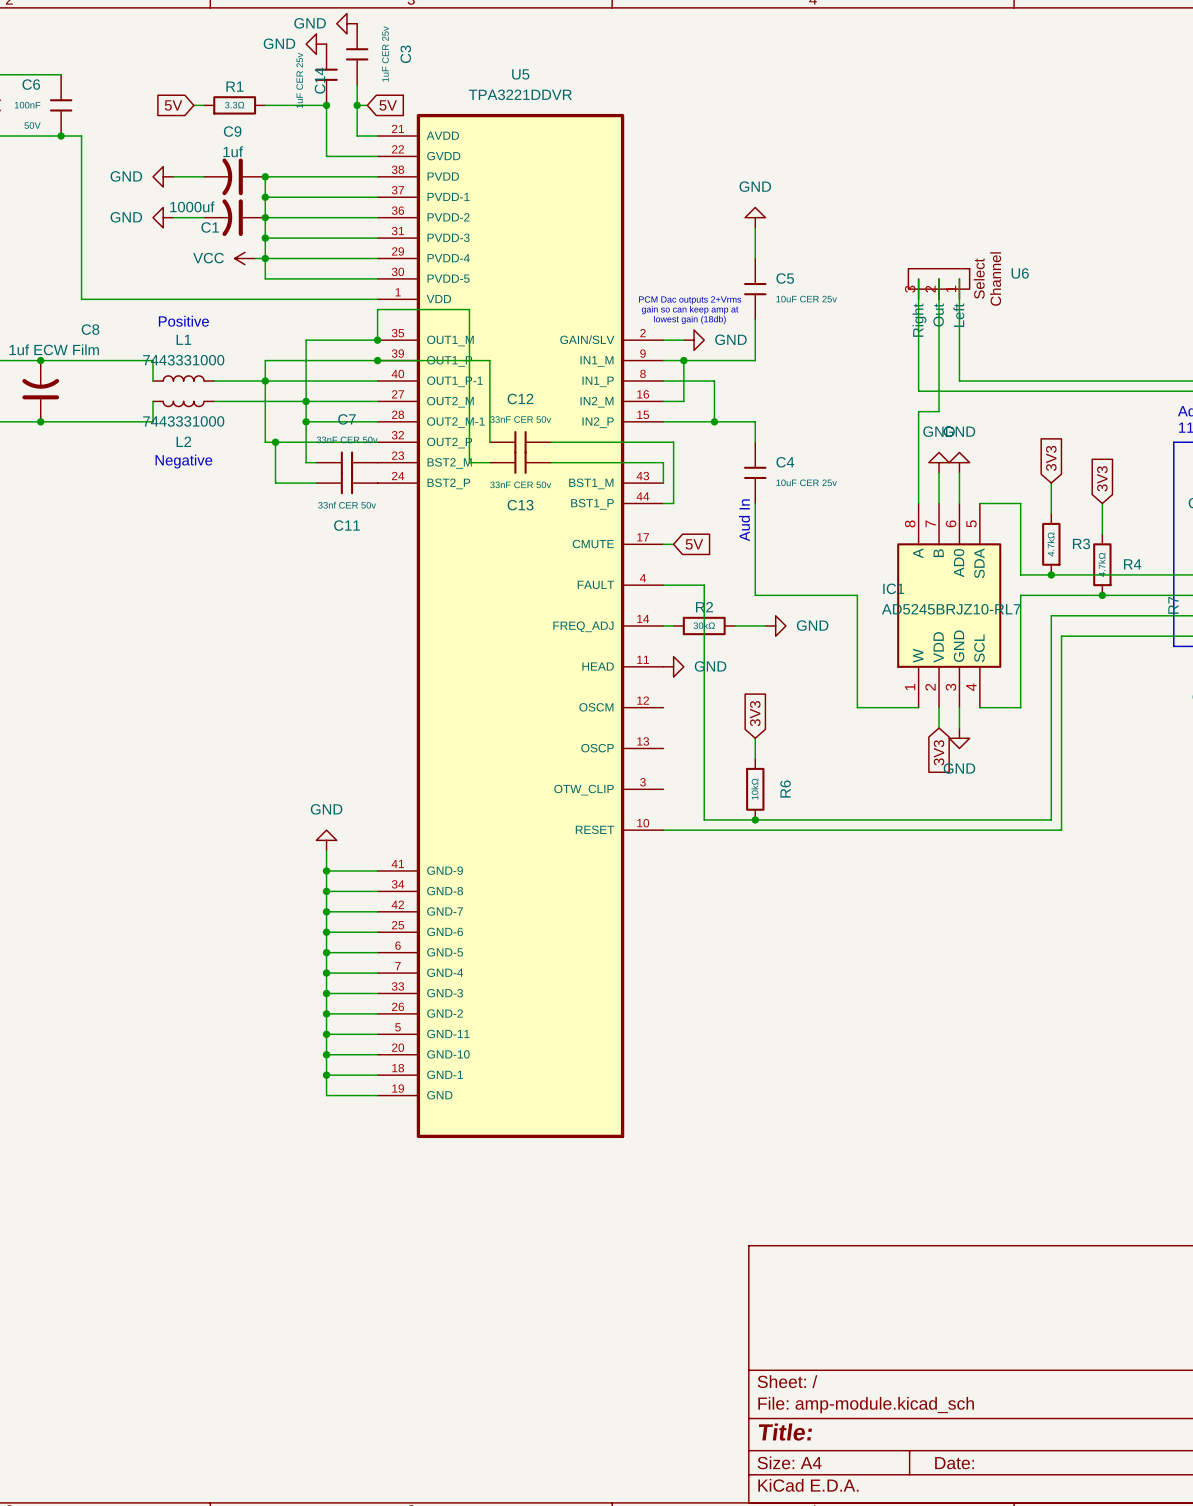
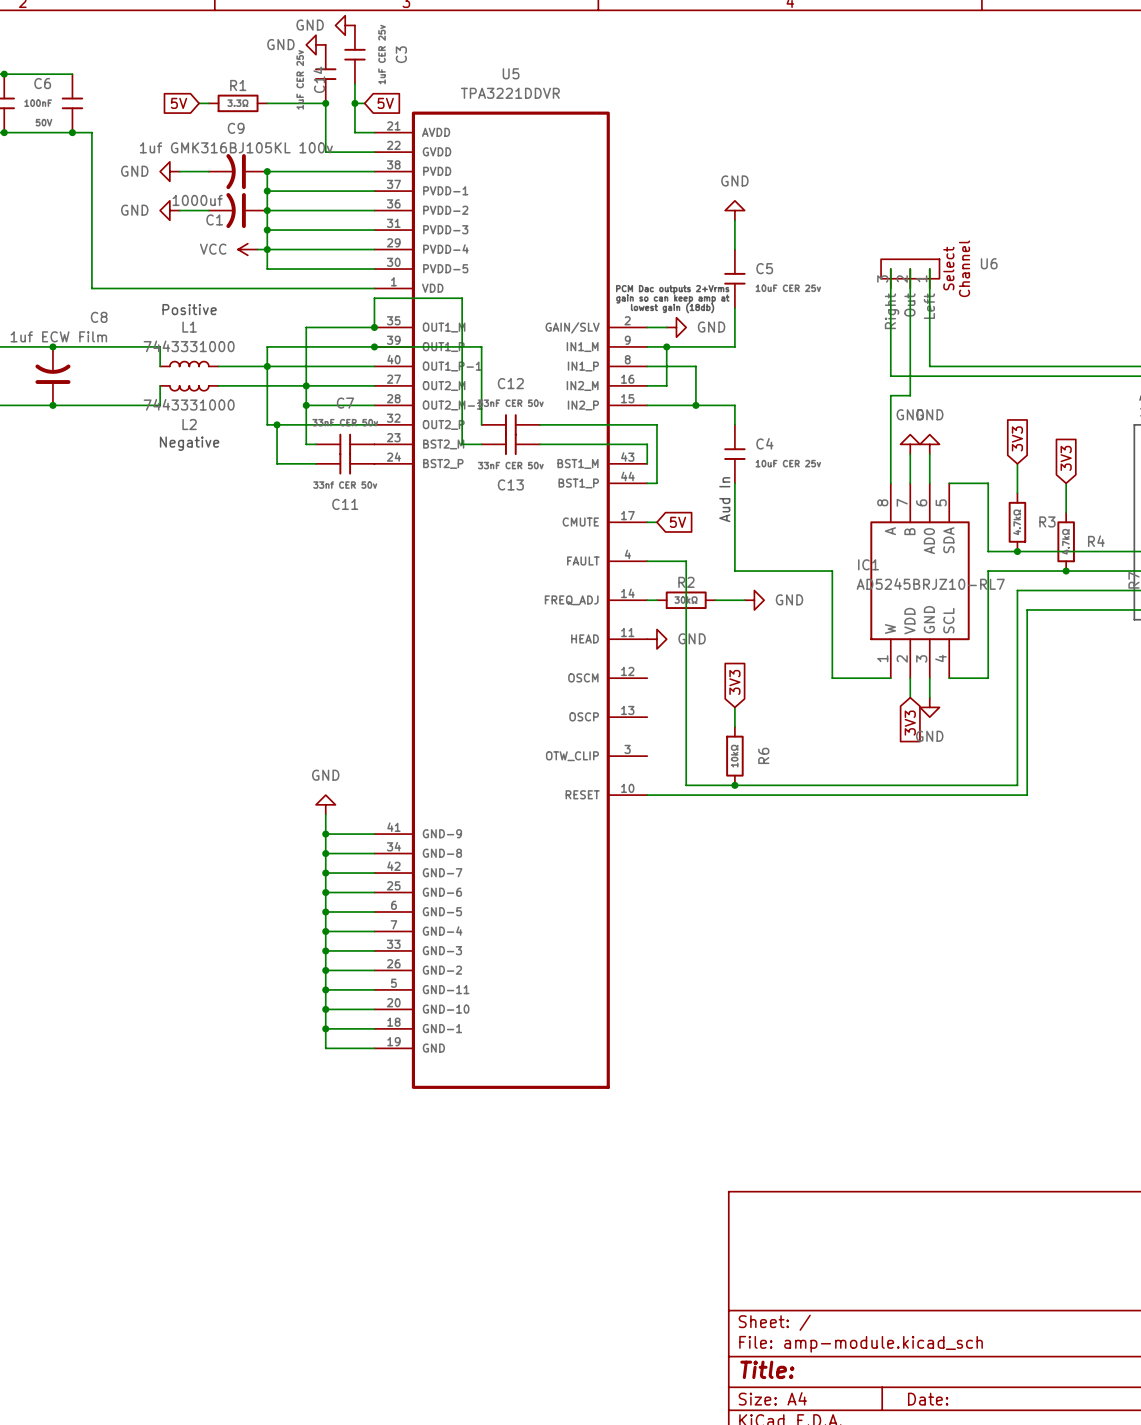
C9 value: 1uf (233, 151) -> 1uf GMK316BJ105KL 100v (236, 147)

